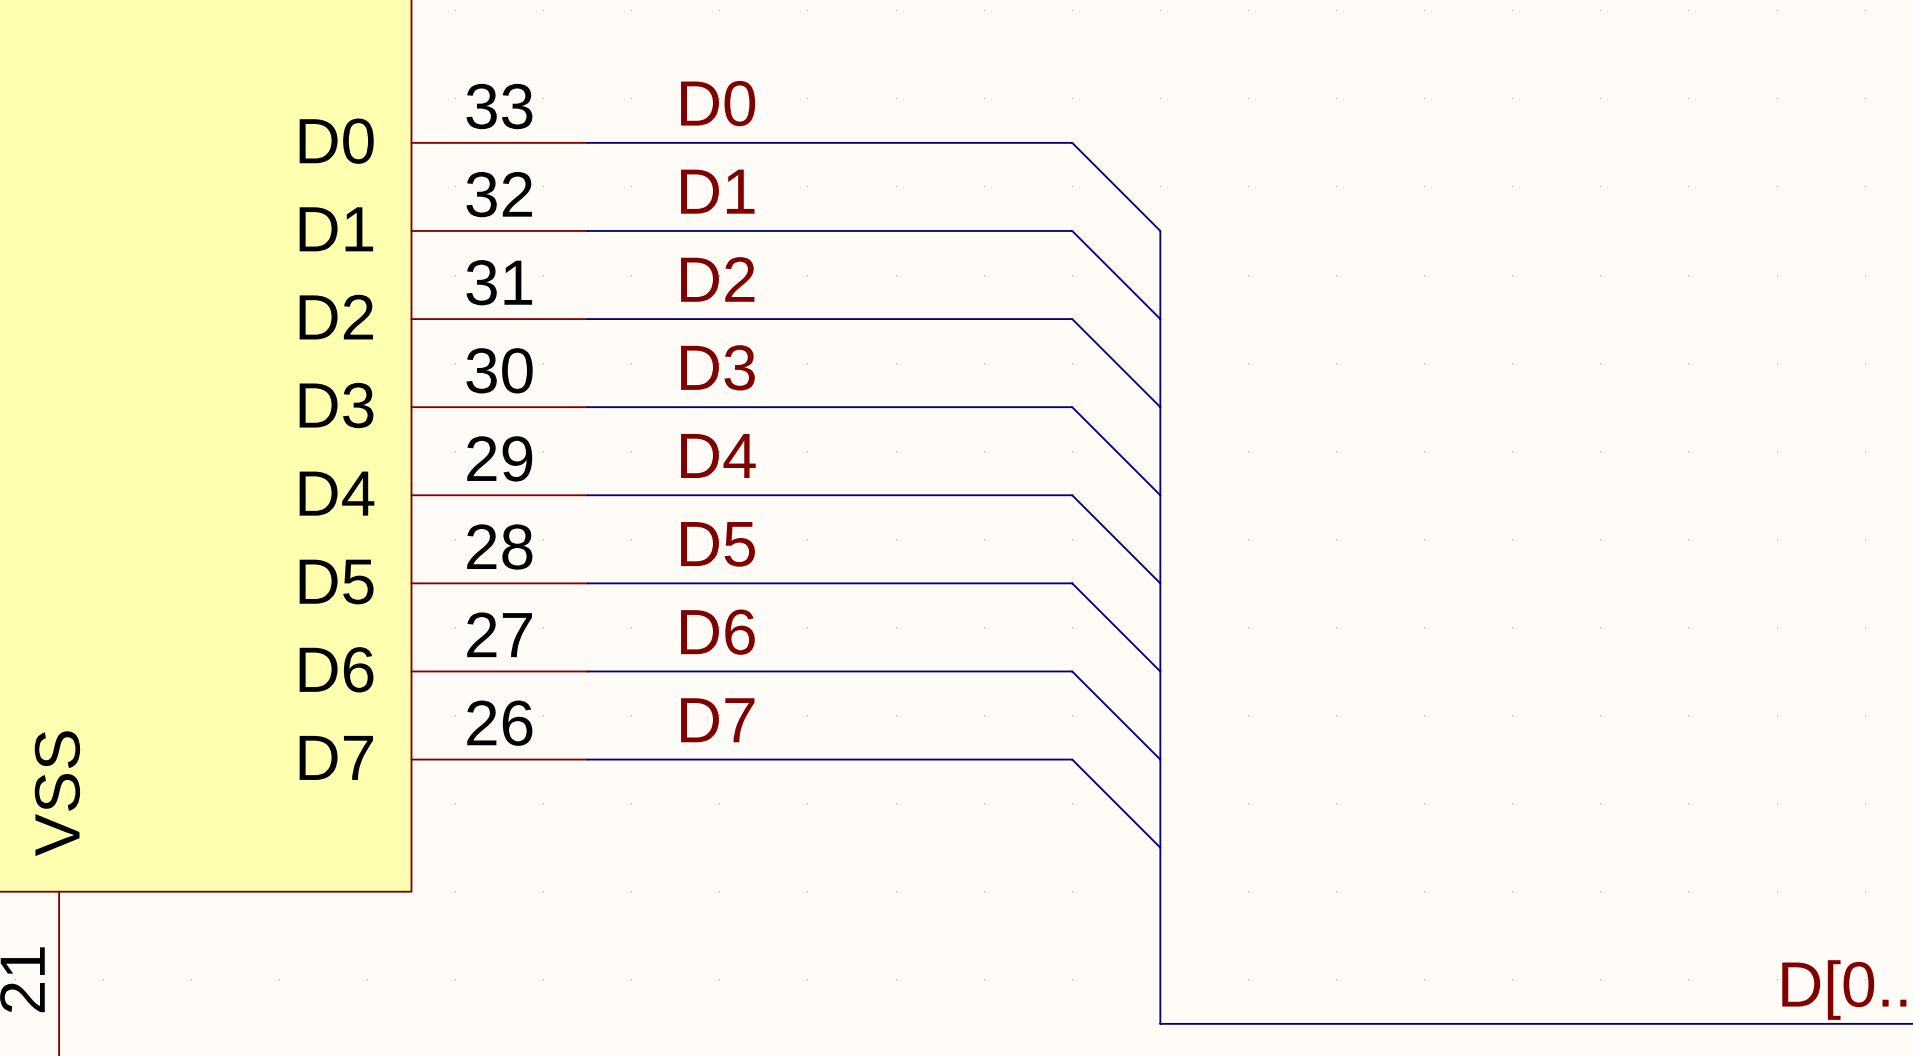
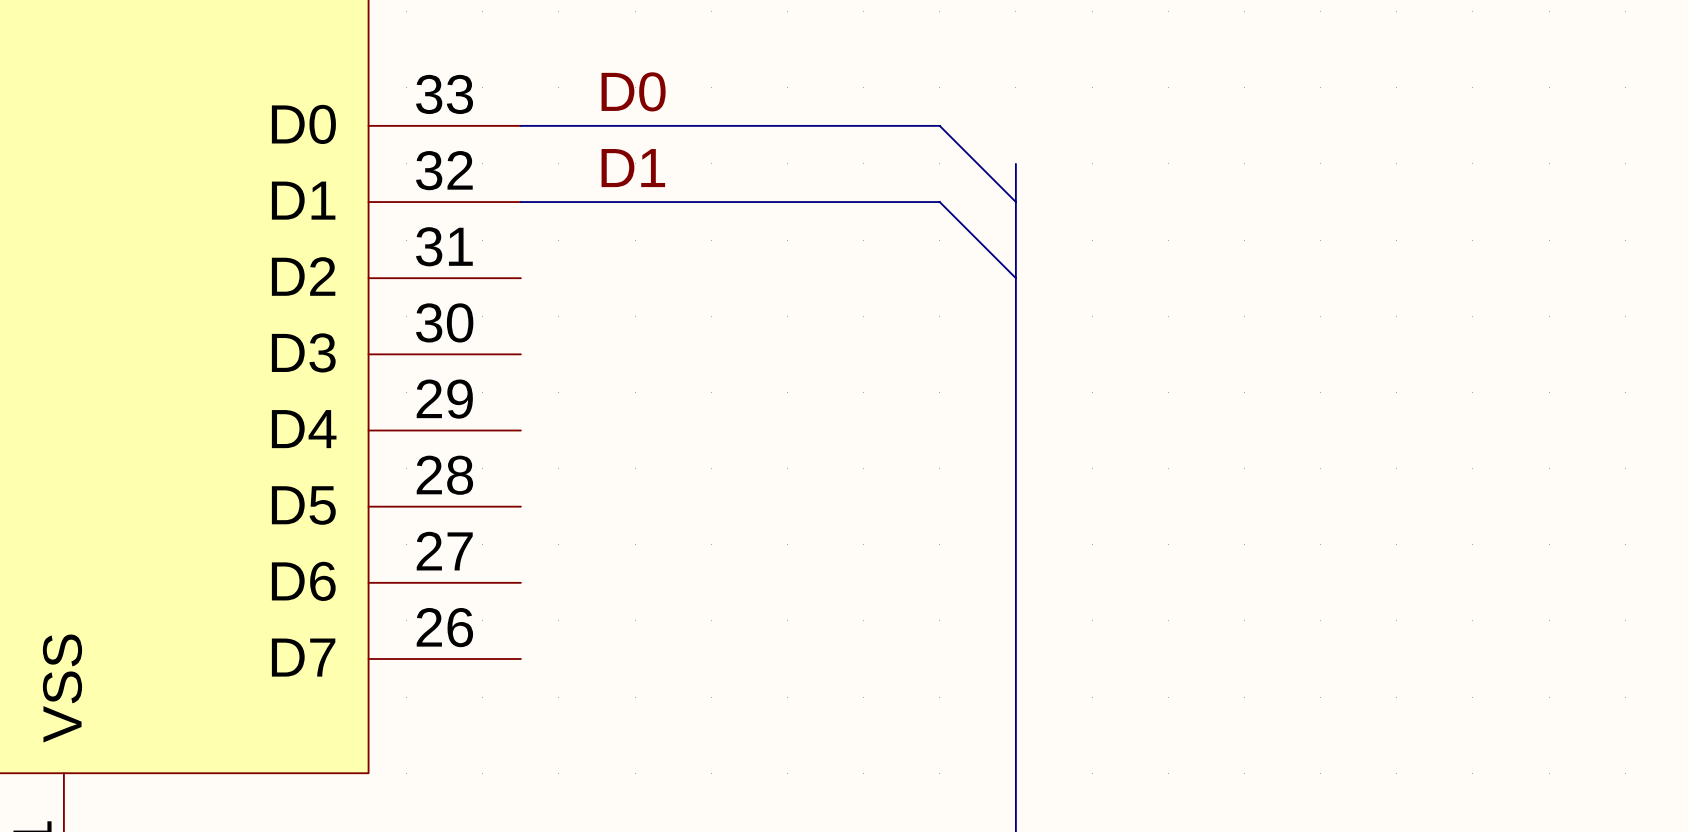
bus: none -> (1015, 163) (1015, 202)
label: D2 (717, 279) -> none
wire: (587, 319) (1072, 319) (1160, 407) -> none
label: D3 (717, 367) -> none
wire: (587, 407) (1072, 407) (1160, 495) -> none
label: D4 (718, 455) -> none
wire: (587, 495) (1072, 495) (1160, 583) -> none
label: D5 (718, 544) -> none
wire: (587, 583) (1072, 583) (1160, 671) -> none
label: D6 (717, 632) -> none
wire: (587, 671) (1072, 671) (1160, 759) -> none
label: D7 (717, 720) -> none
wire: (587, 759) (1072, 759) (1160, 847) -> none

